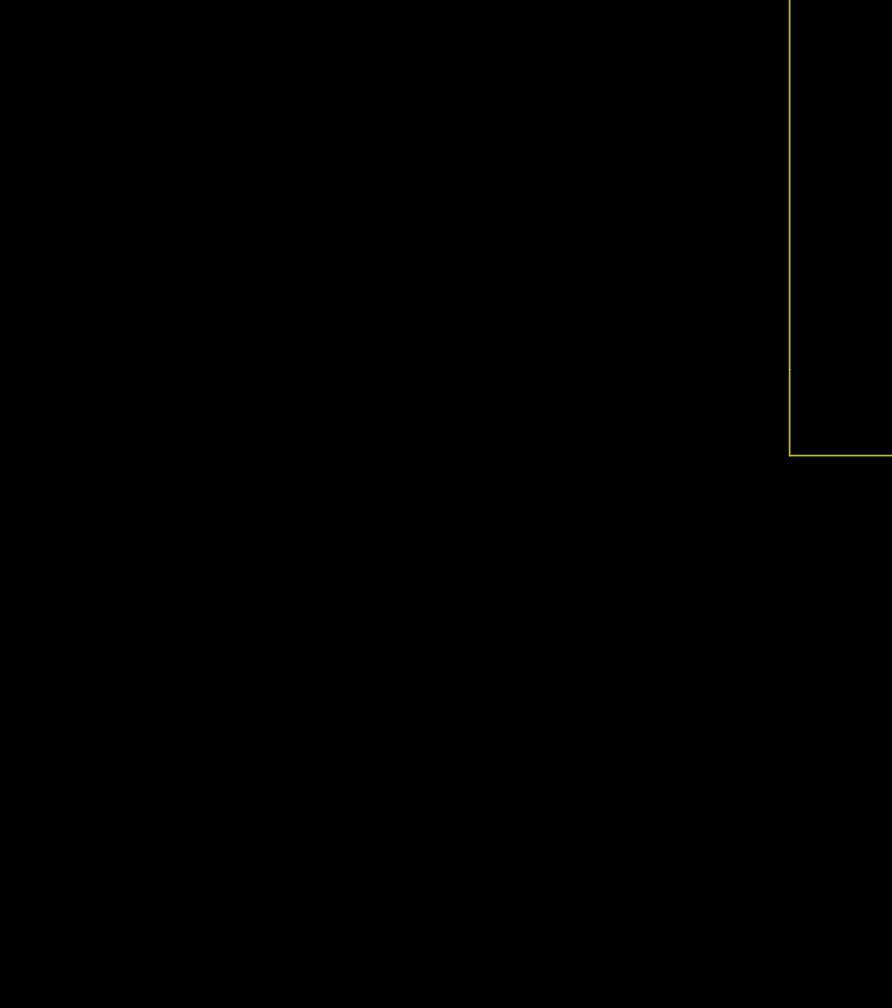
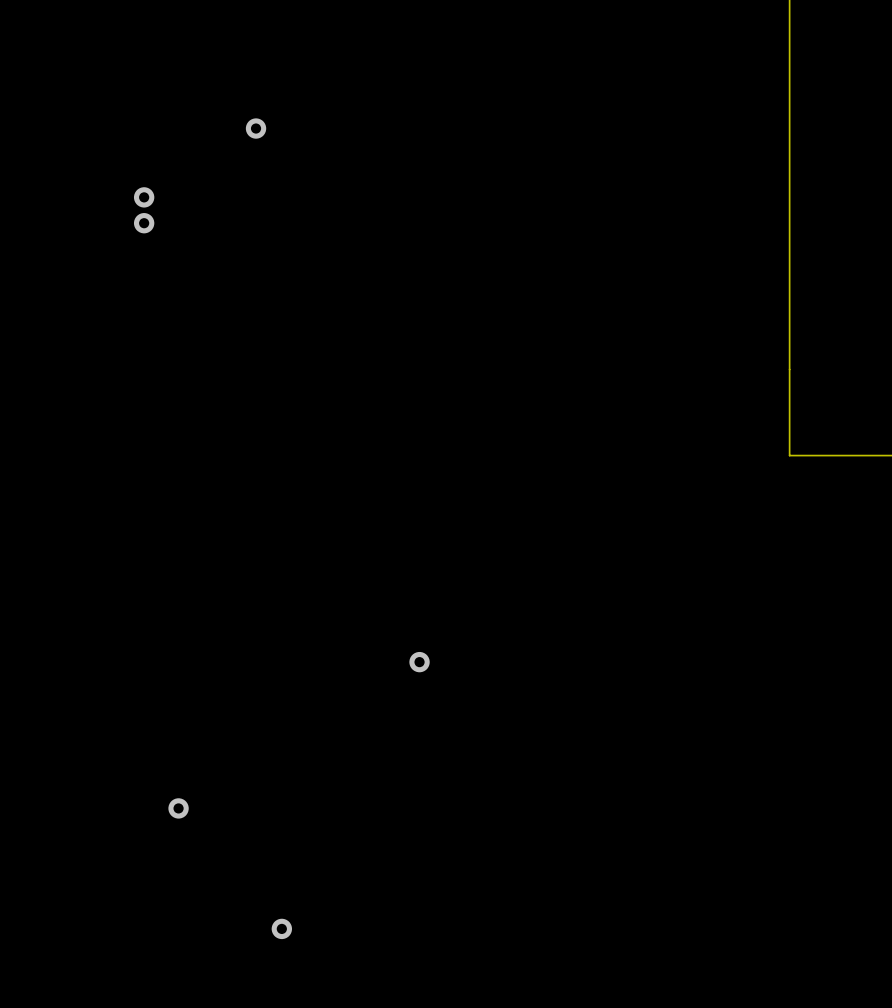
via: none -> (256, 128)
via: none -> (144, 197)
via: none -> (144, 223)
via: none -> (419, 662)
via: none -> (178, 808)
via: none -> (281, 928)

